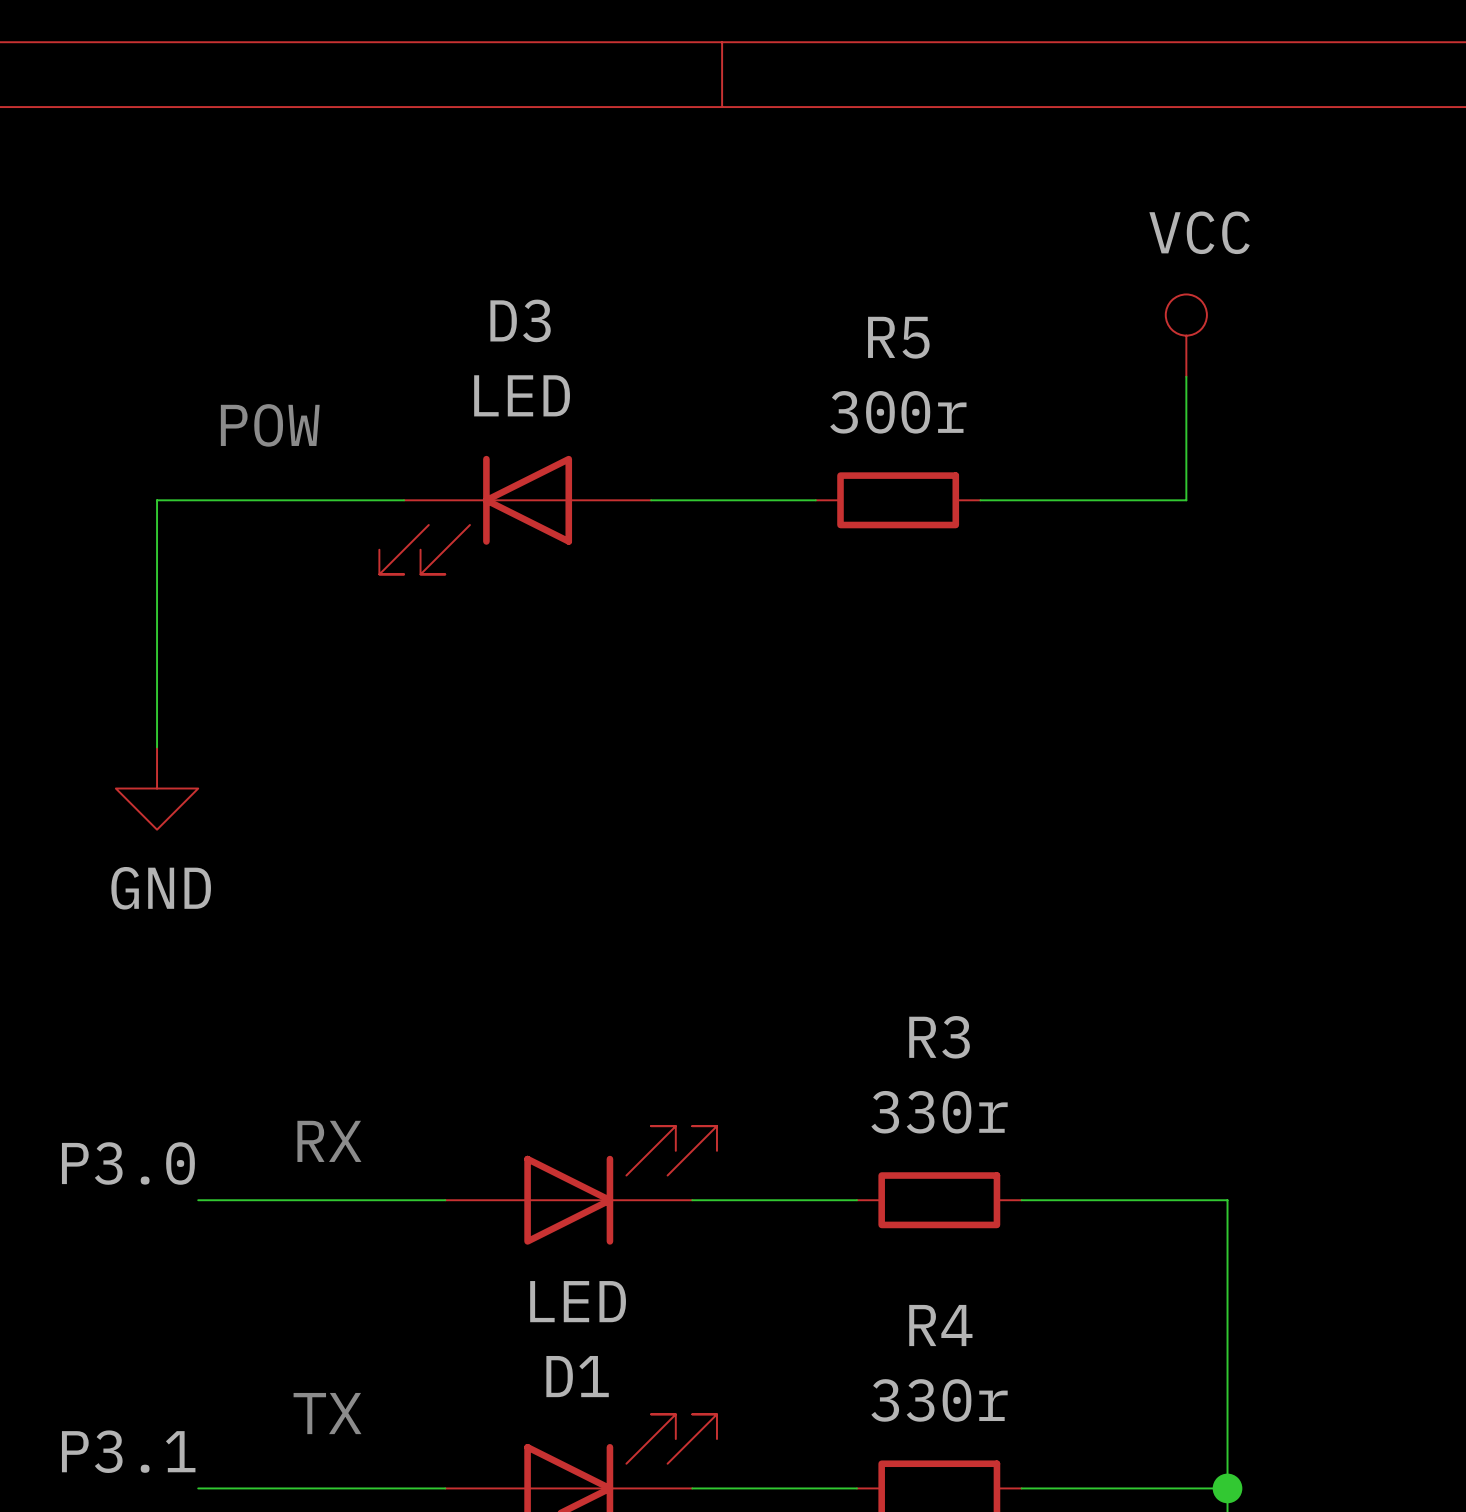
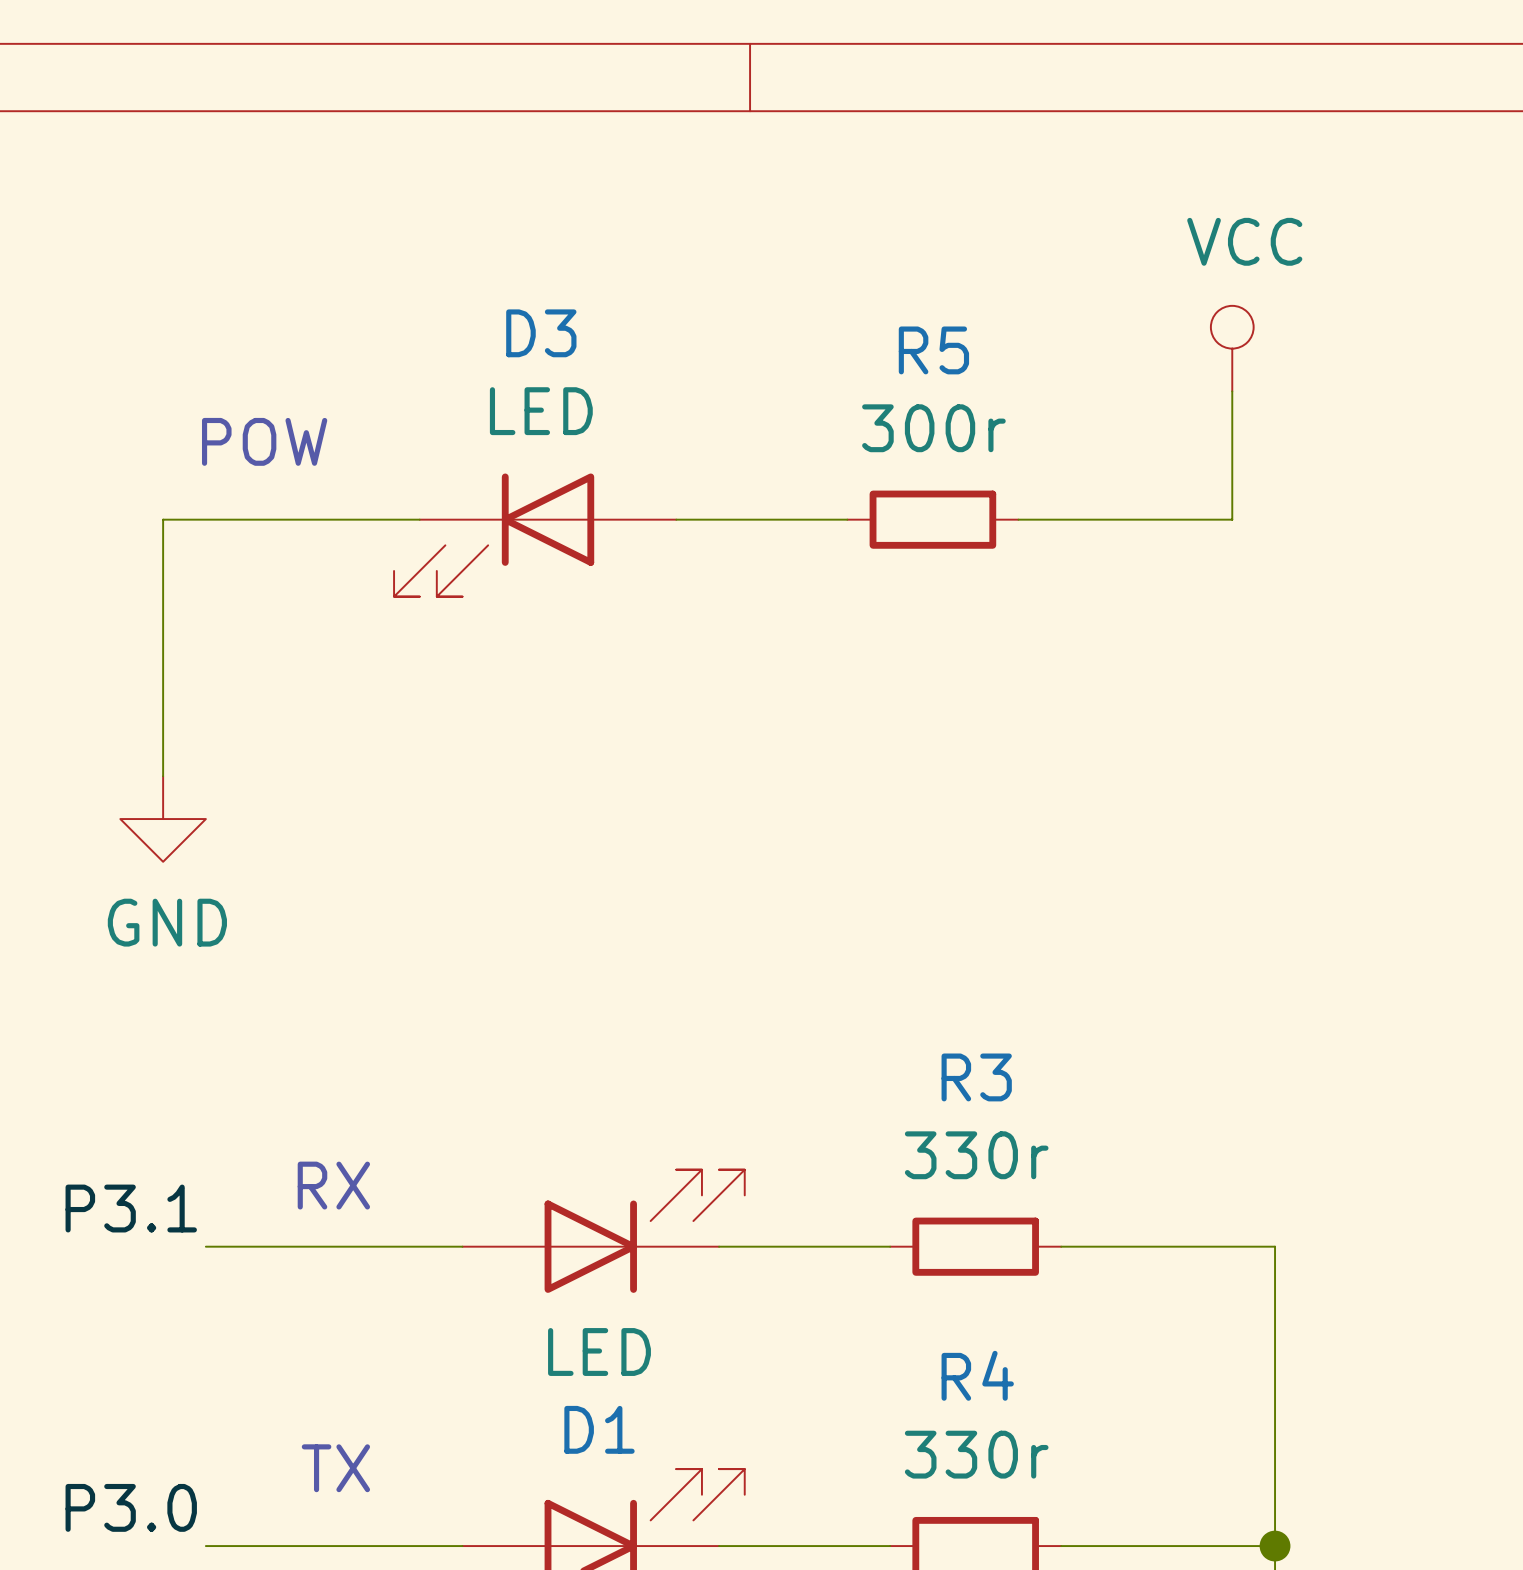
label: P3.0 (128, 1163) -> P3.1 (131, 1208)
label: P3.1 (128, 1451) -> P3.0 (131, 1507)

